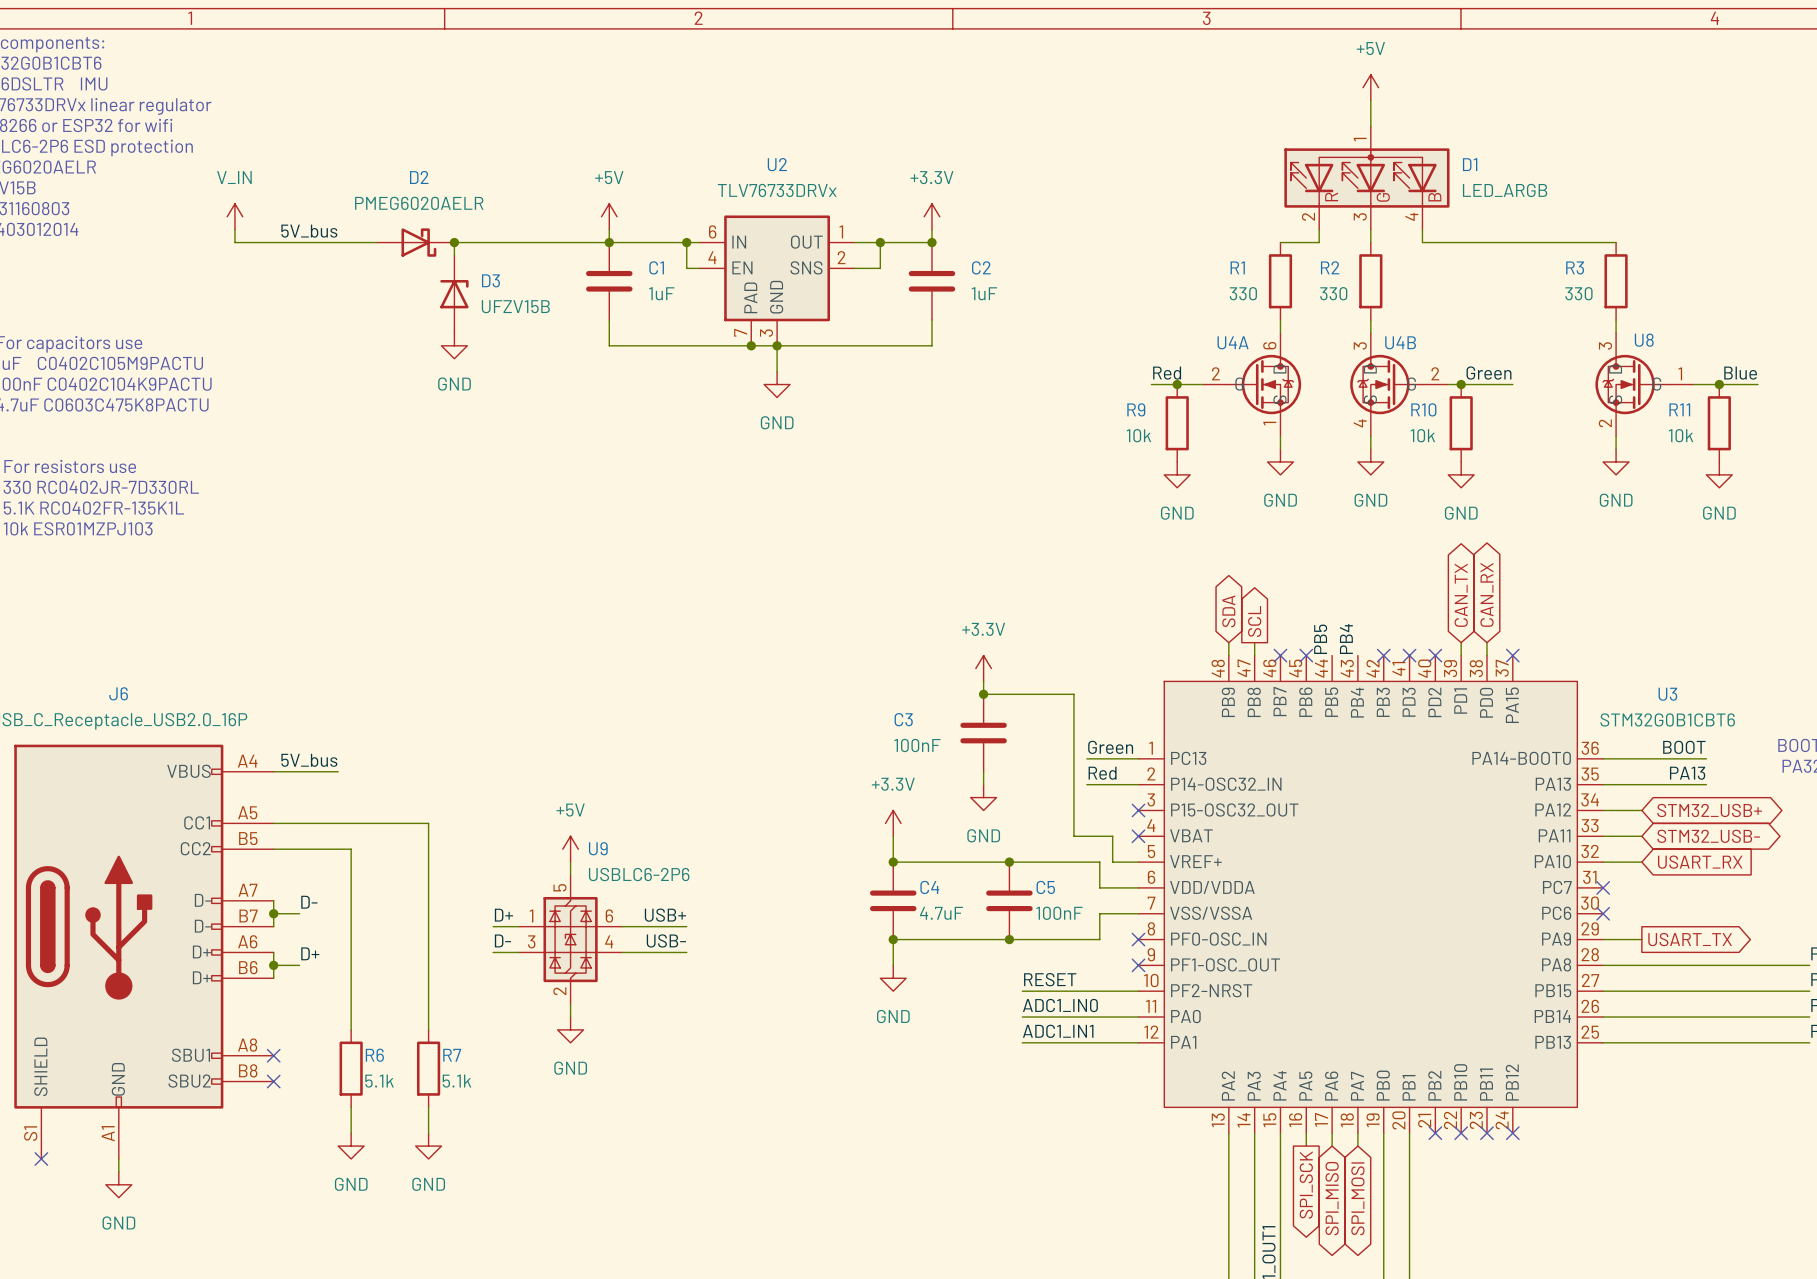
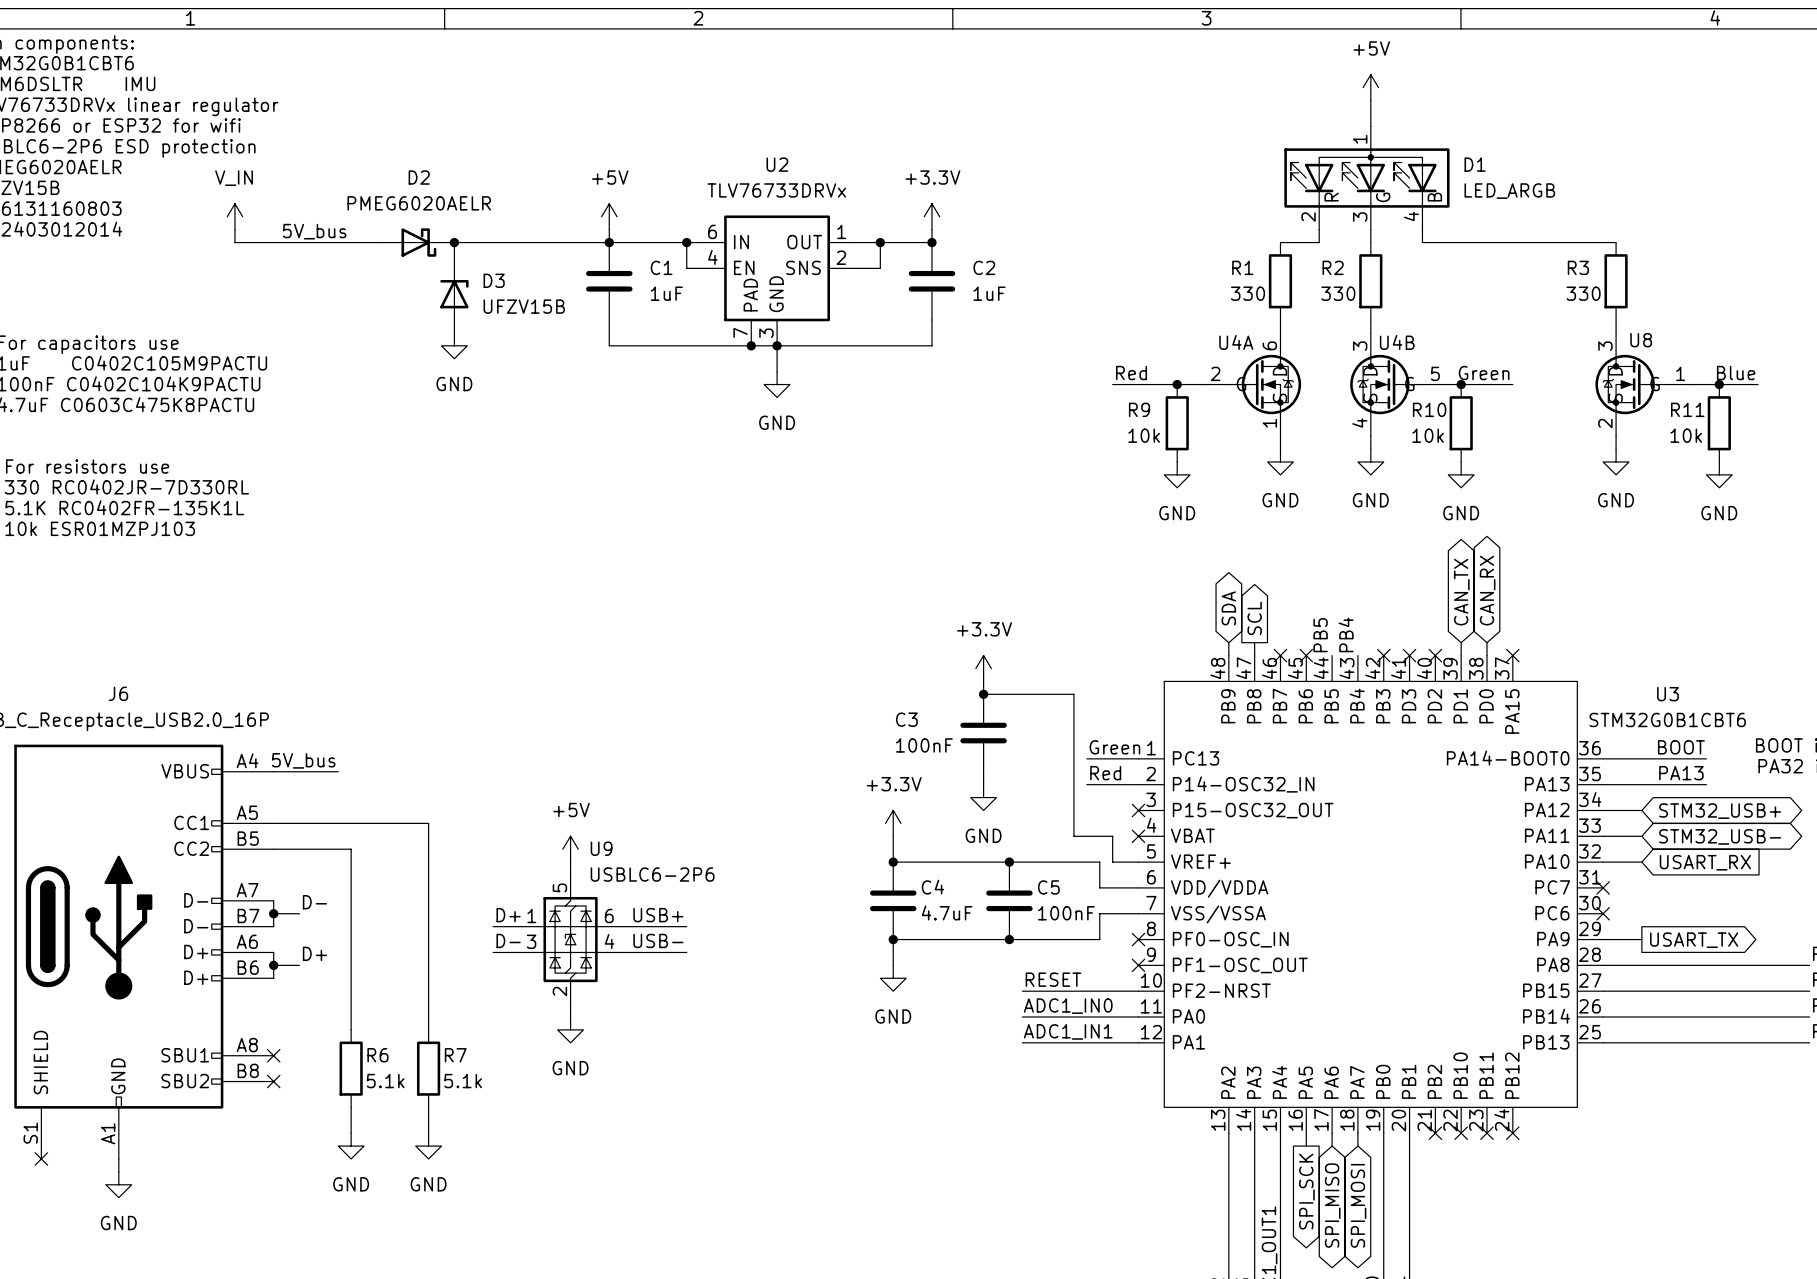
label position: Red (1167, 373) -> Red (1131, 373)
U4B pin number: 2 (1435, 373) -> 5 (1435, 373)
wire: none -> (1112, 384) (1151, 384)

